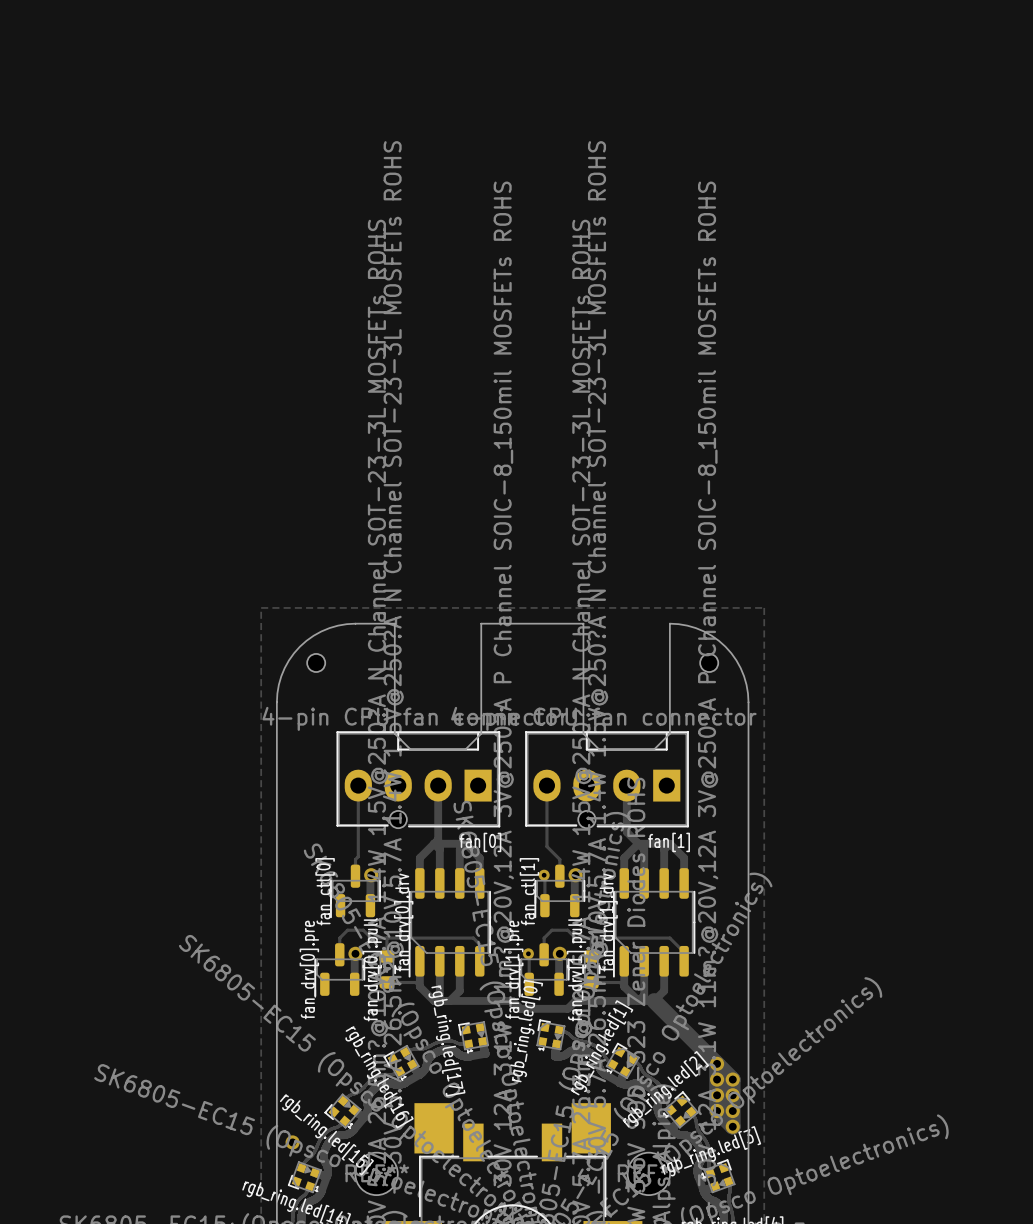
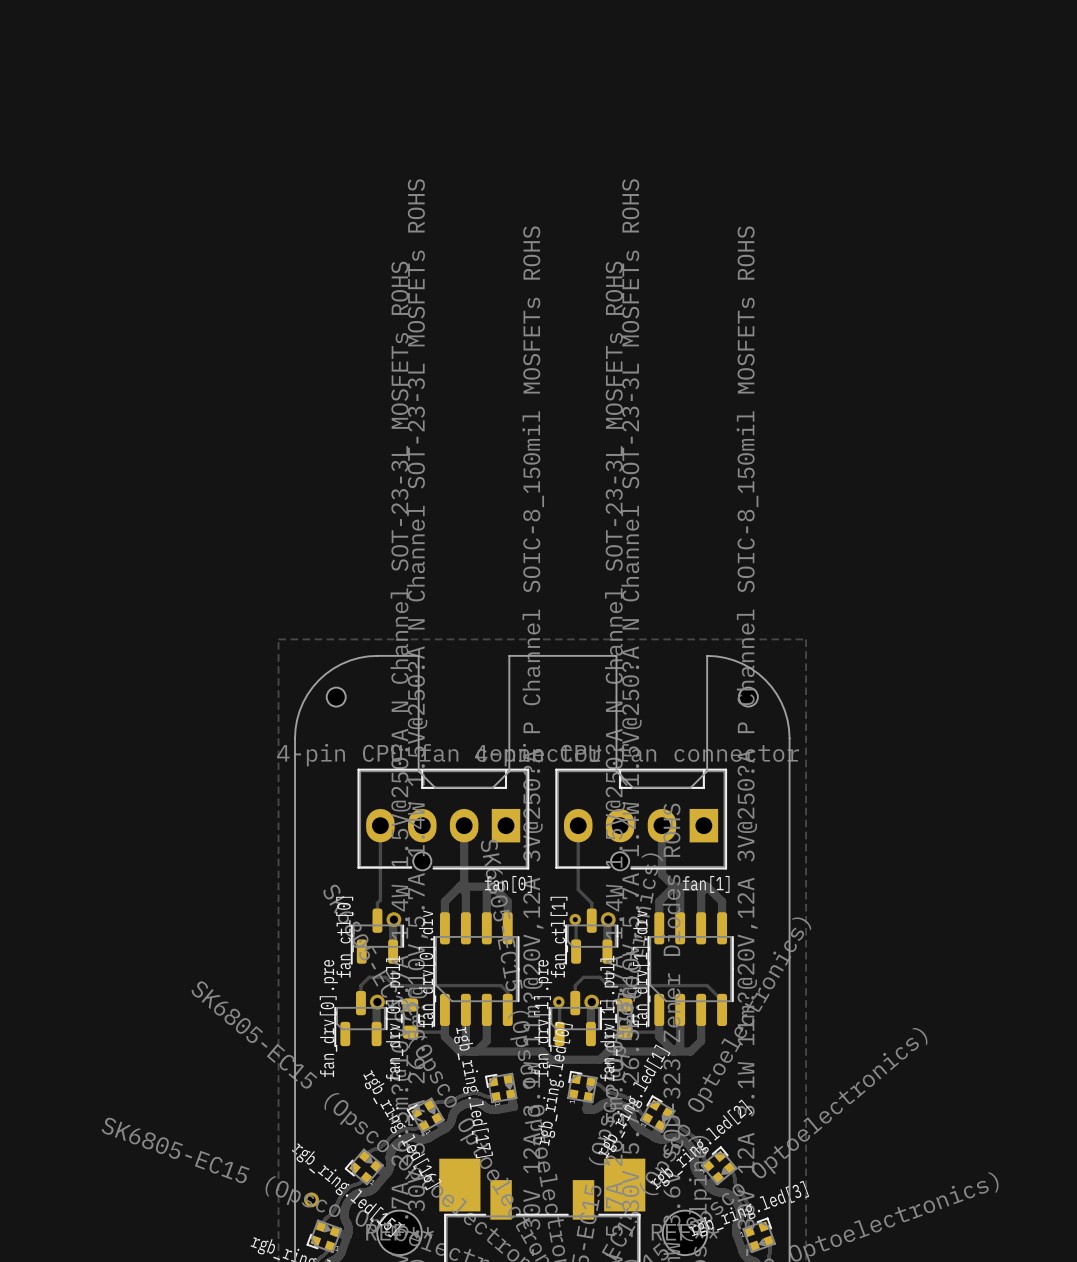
track: (654, 1000) (732, 1079) (732, 1126) (717, 1111) (717, 1063) -> none
via: (717, 1063) -> none
via: (717, 1079) -> none
via: (732, 1079) -> none
via: (717, 1095) -> none
via: (732, 1095) -> none
via: (717, 1111) -> none
via: (732, 1111) -> none
via: (732, 1126) -> none

